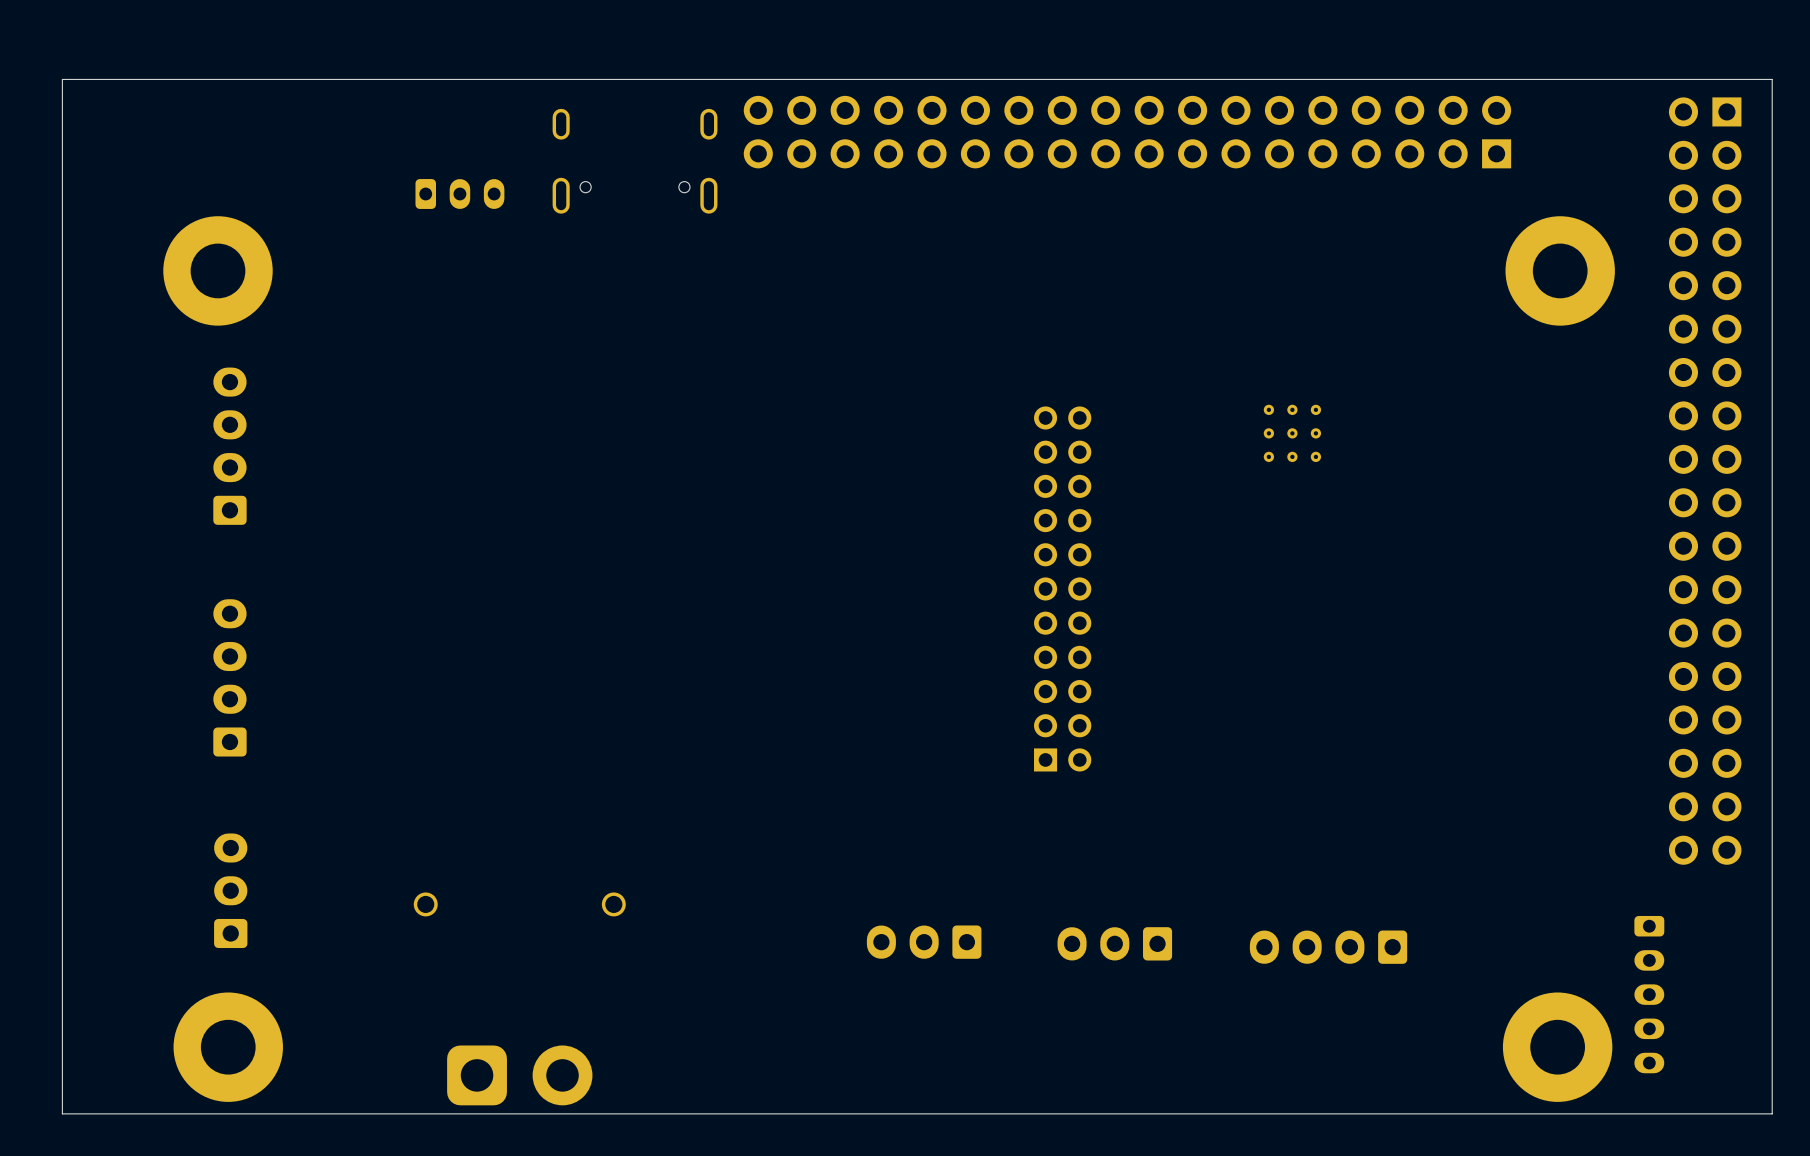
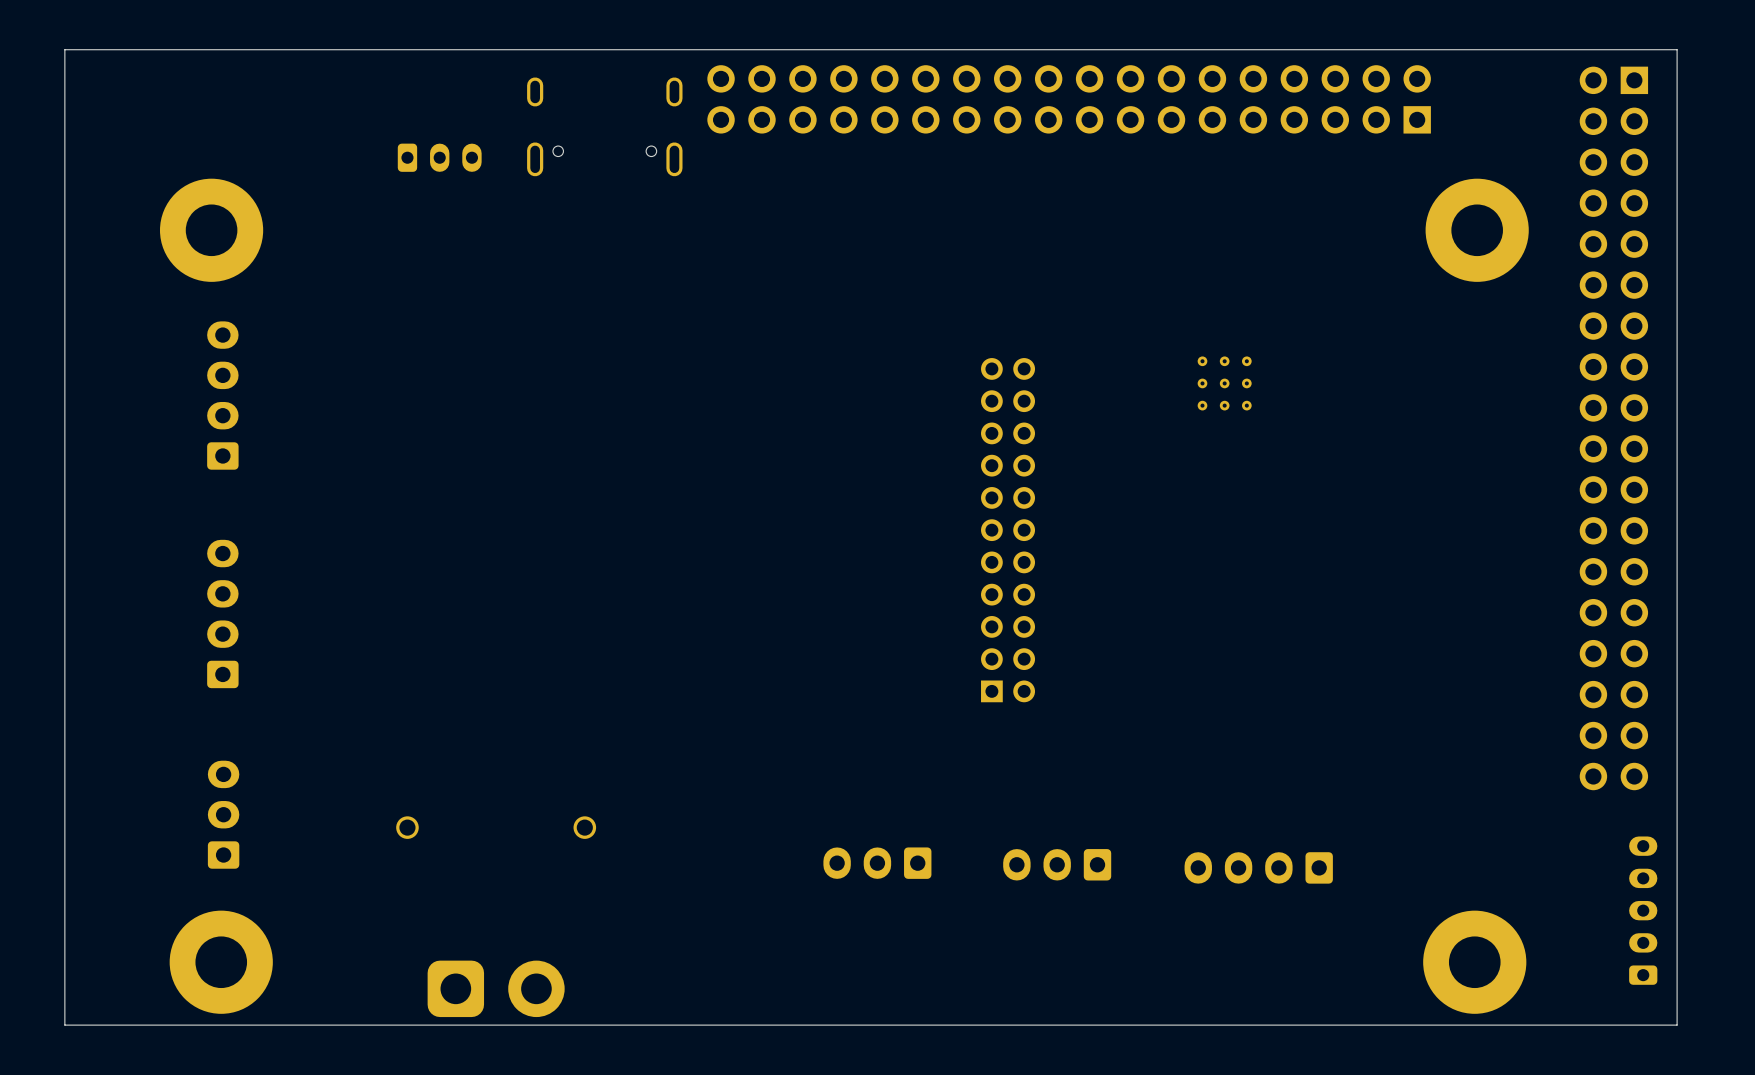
part rotation: 0° (1649, 994) -> 180° (1643, 910)

